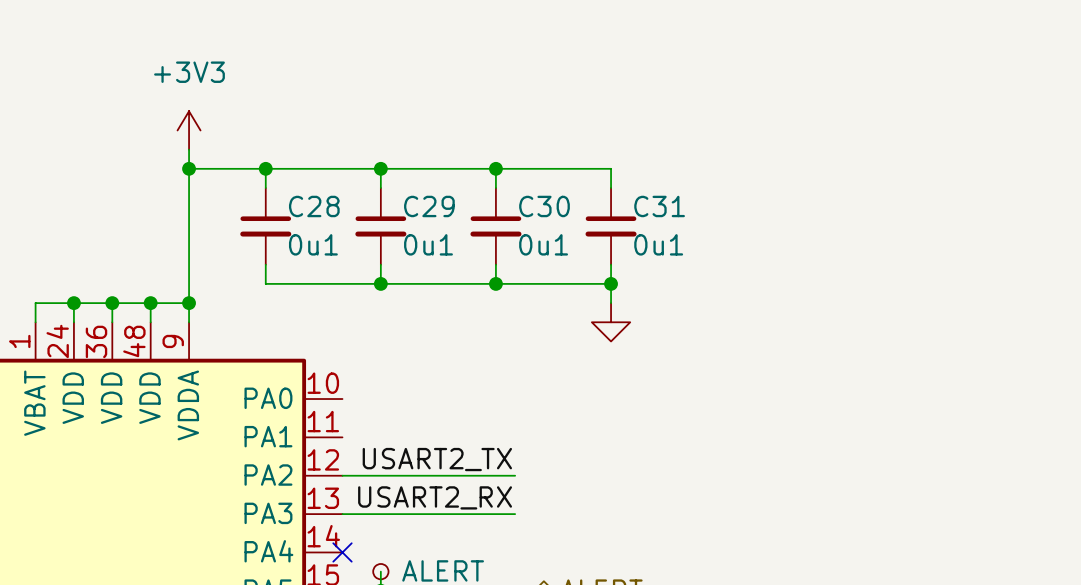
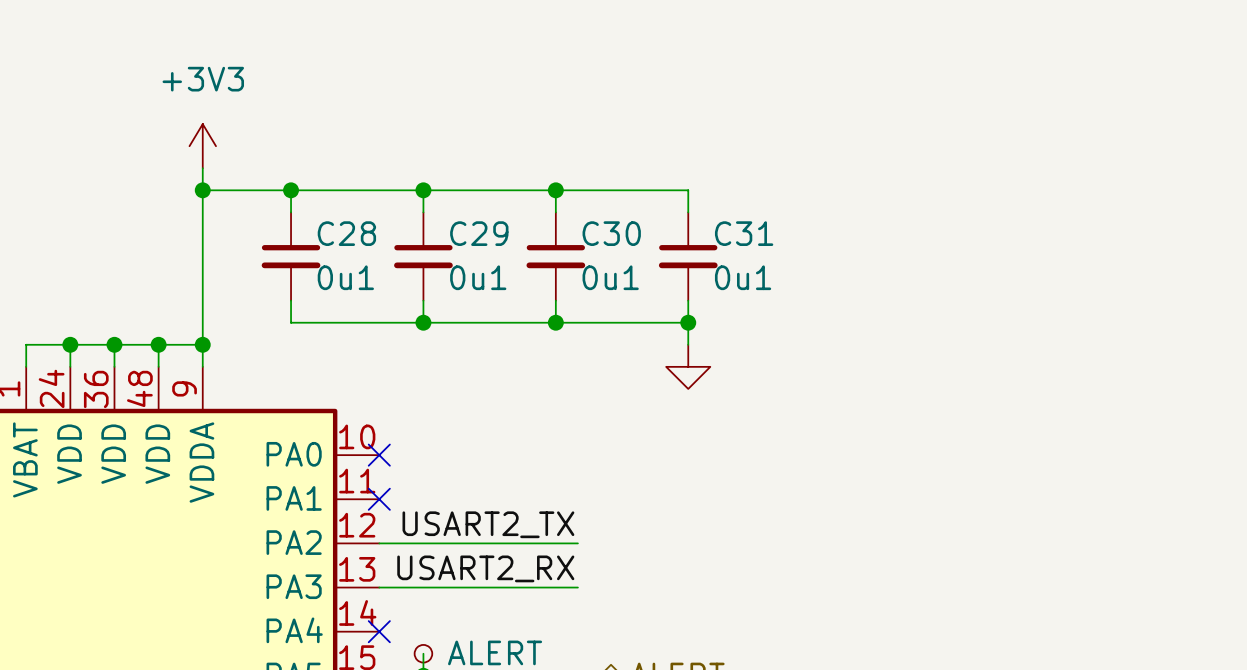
no-connect mark: none -> (379, 455)
no-connect mark: none -> (379, 499)

